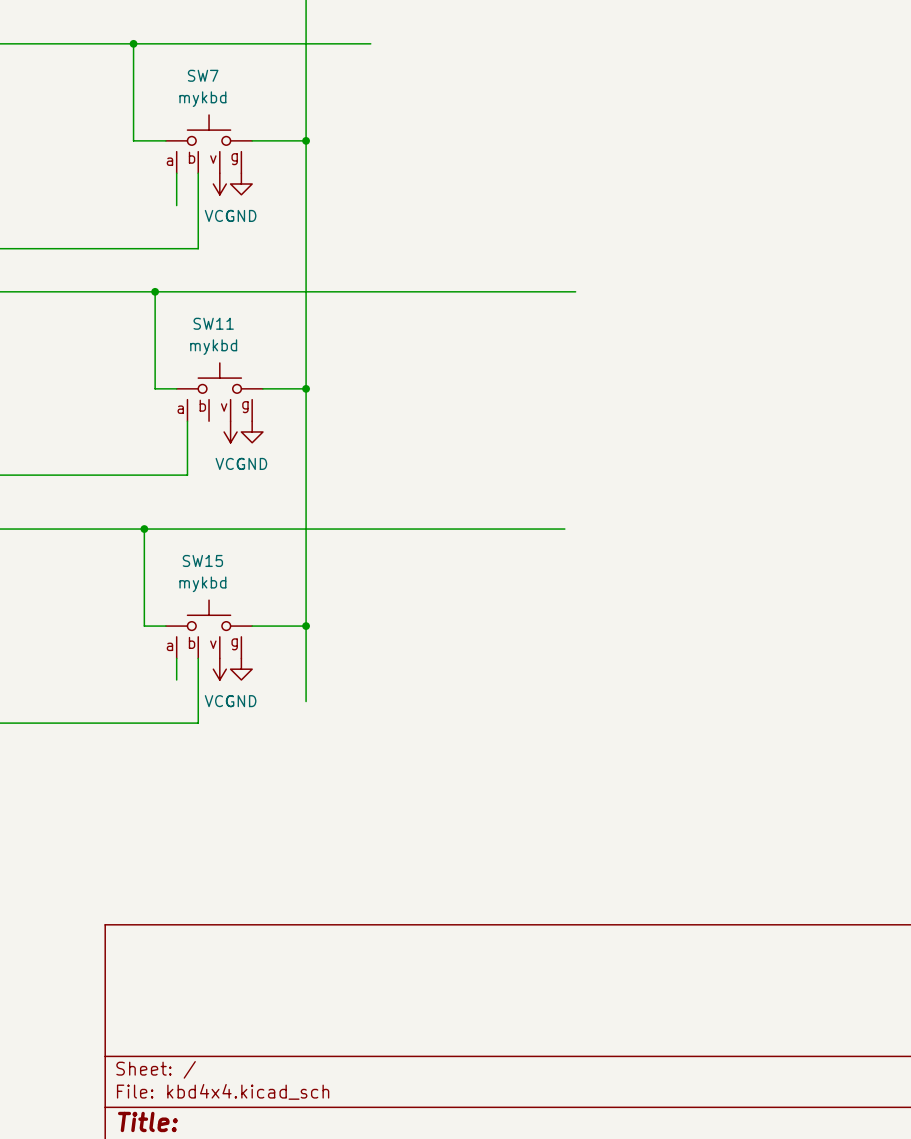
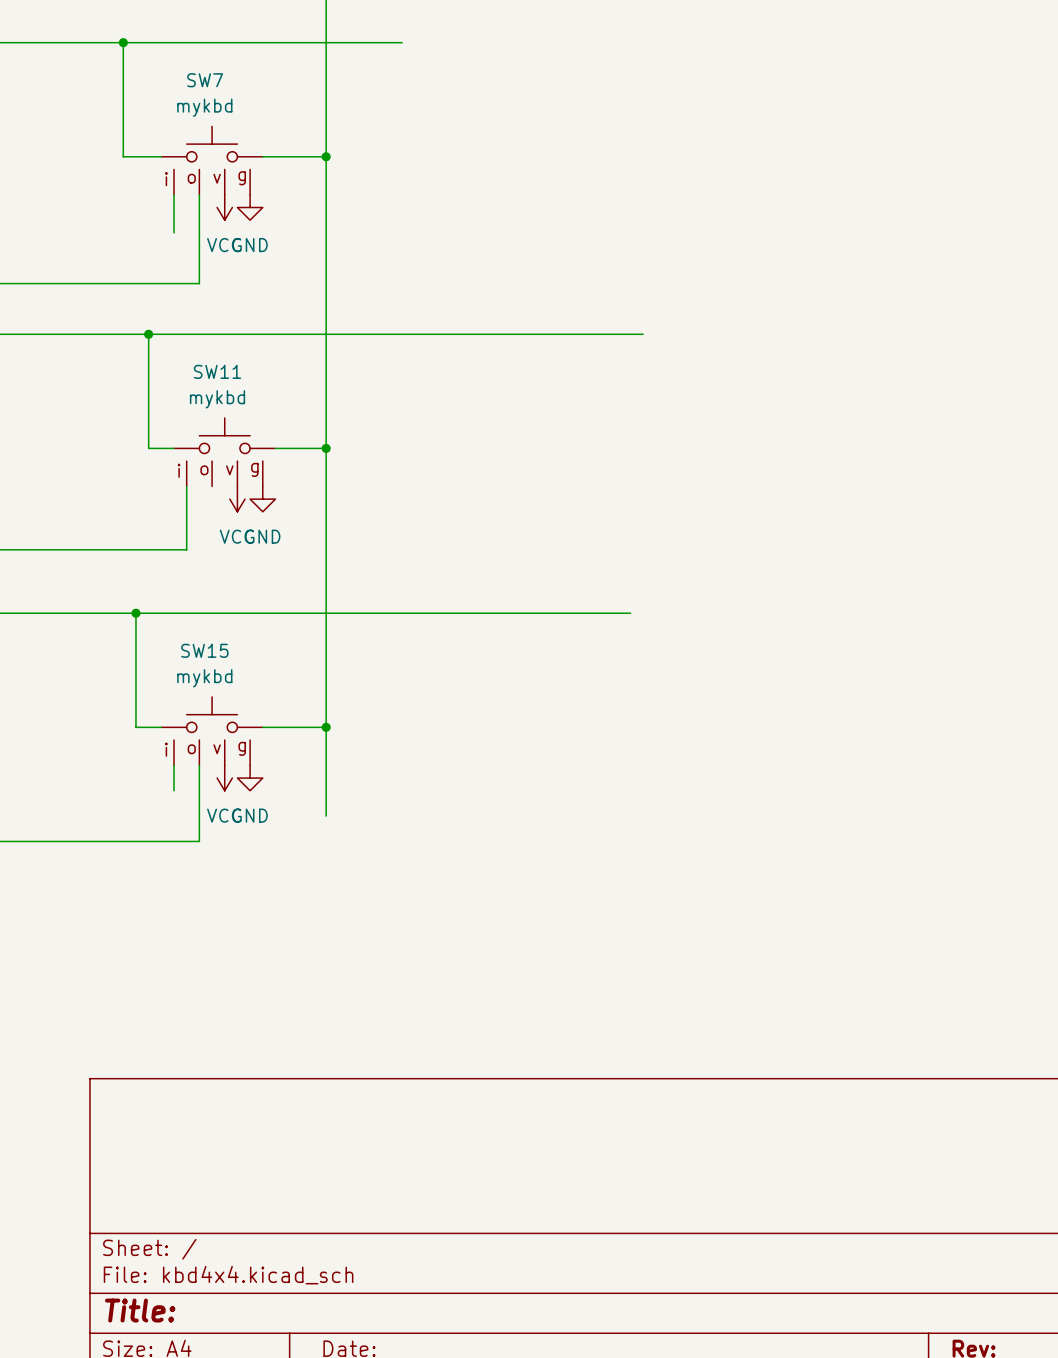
SW7 text: b (192, 157) -> o (191, 178)
SW7 text: a (169, 161) -> i (166, 179)
SW11 text: b (202, 405) -> o (204, 470)
SW11 text: a (180, 409) -> i (179, 470)
SW15 text: b (192, 642) -> o (191, 749)
SW15 text: a (169, 646) -> i (166, 749)

